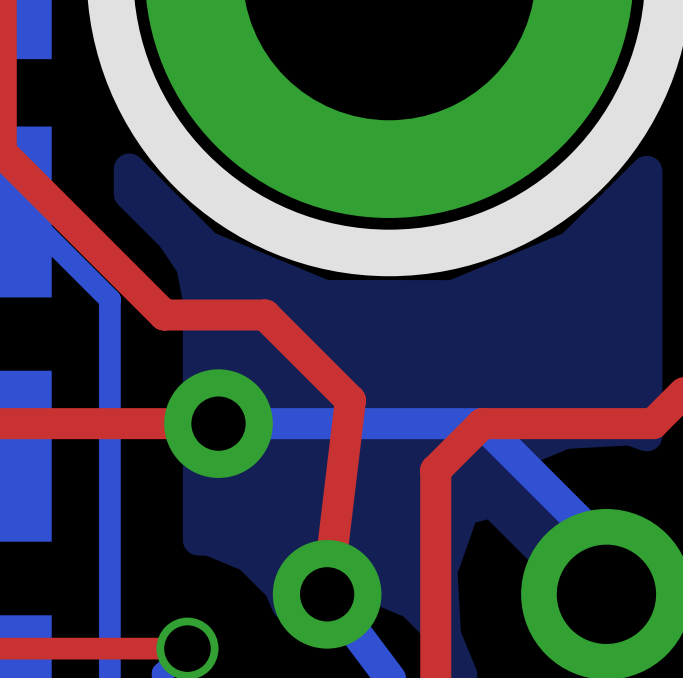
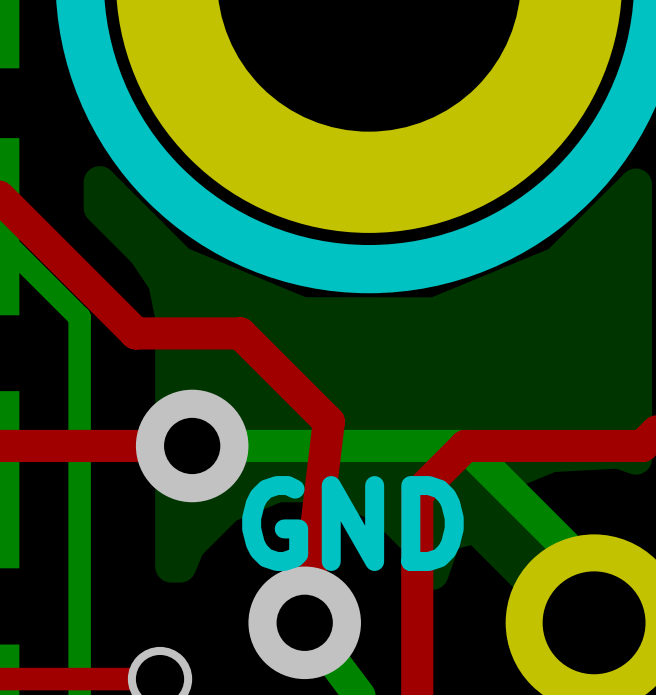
text: none -> GND (352, 523)

